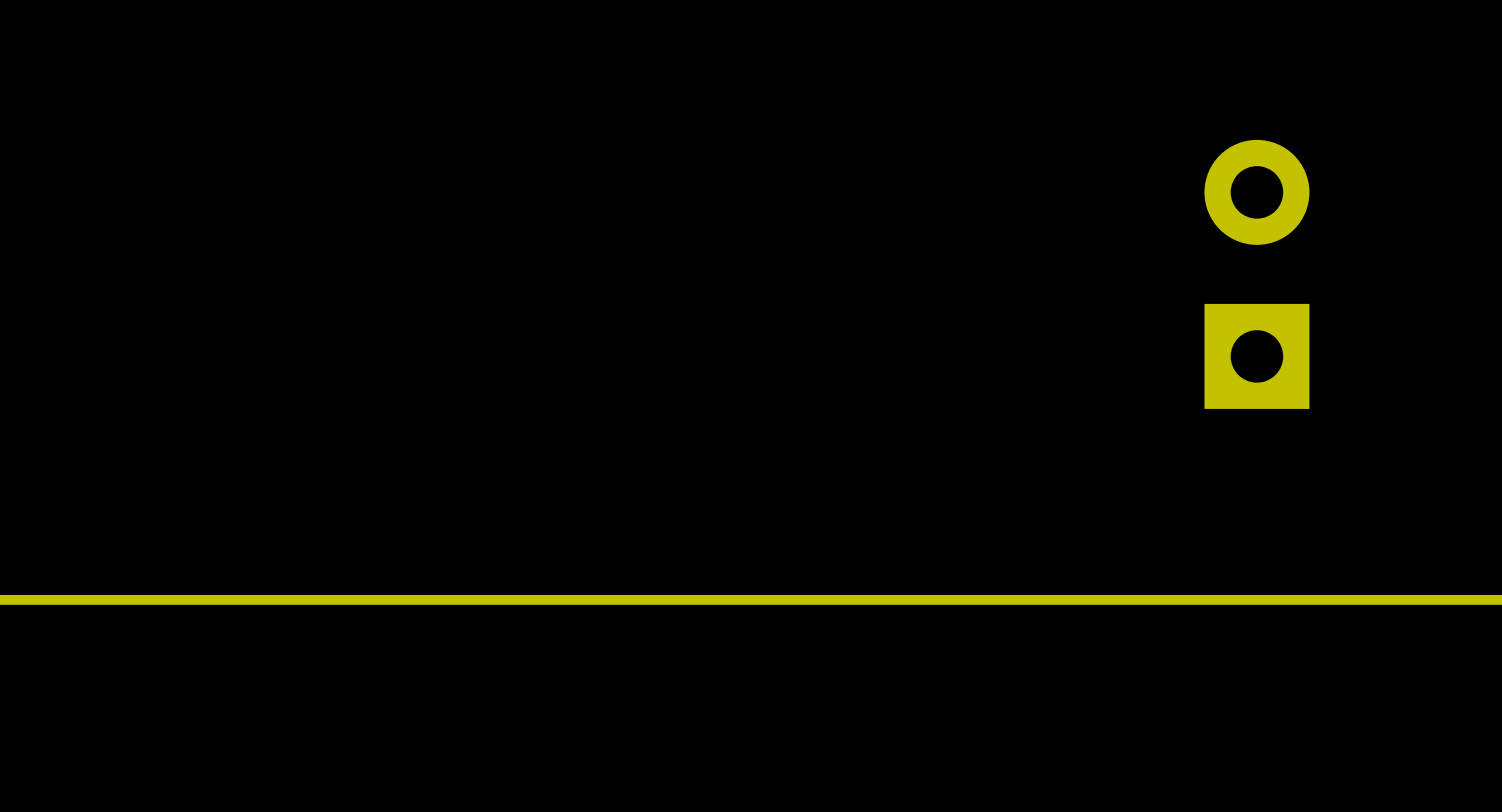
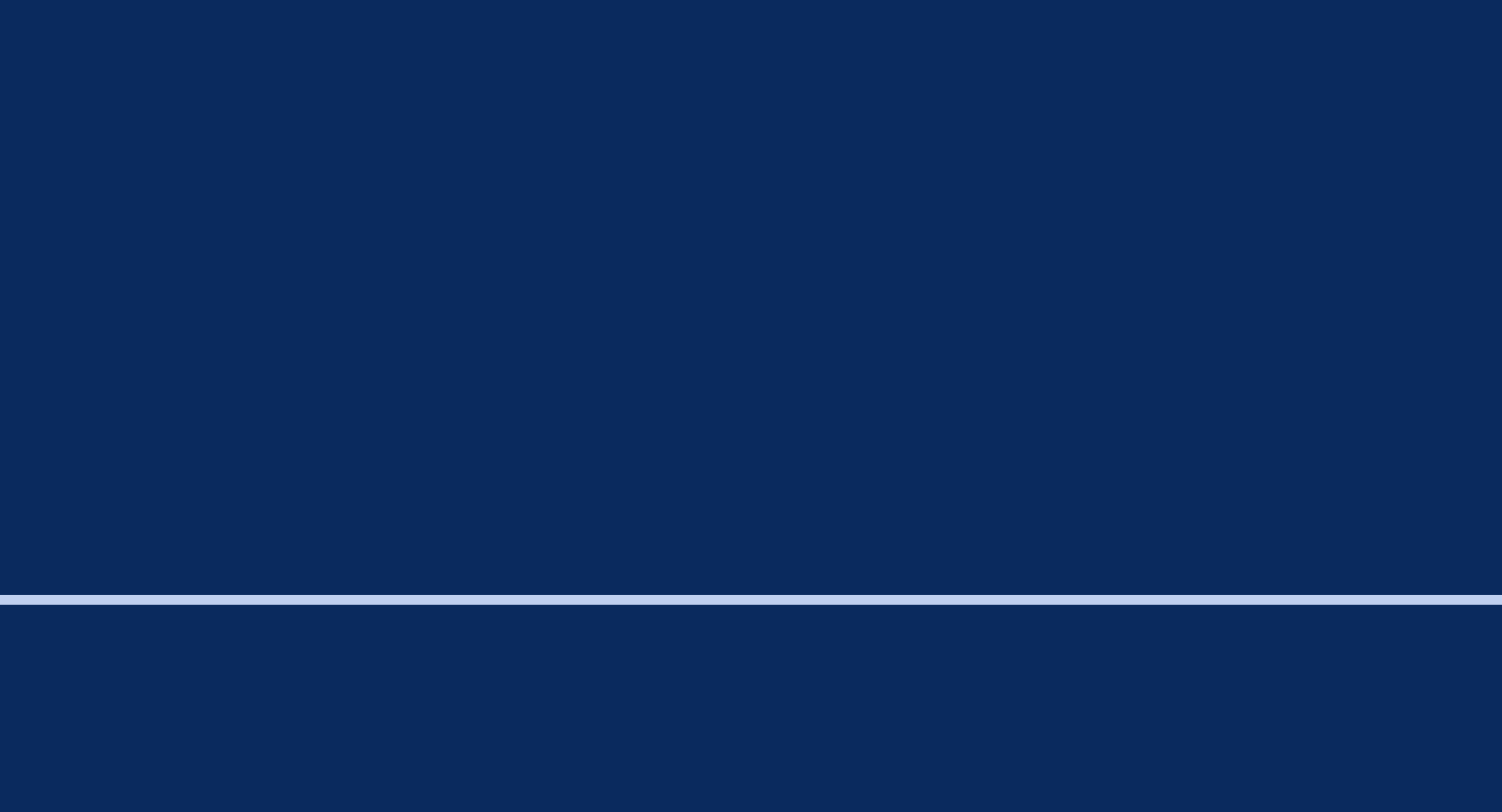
part: (1256, 274) -> none

